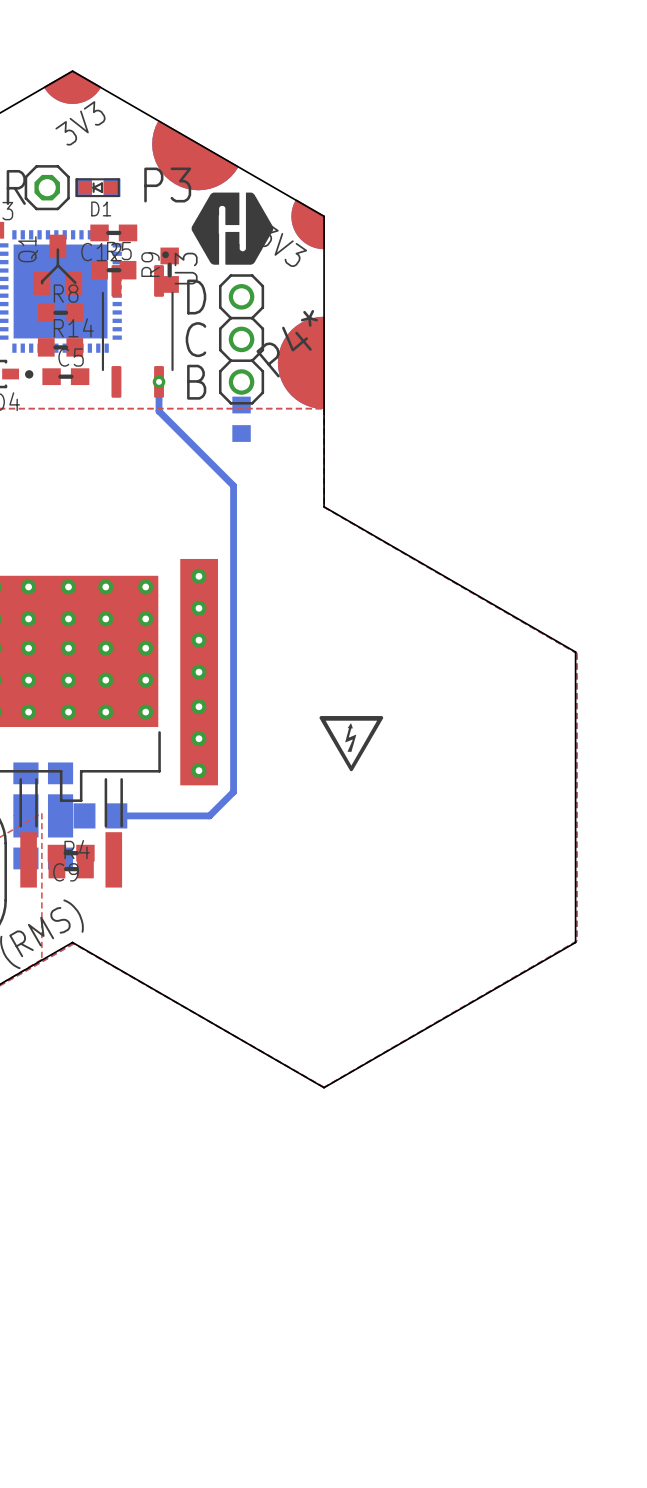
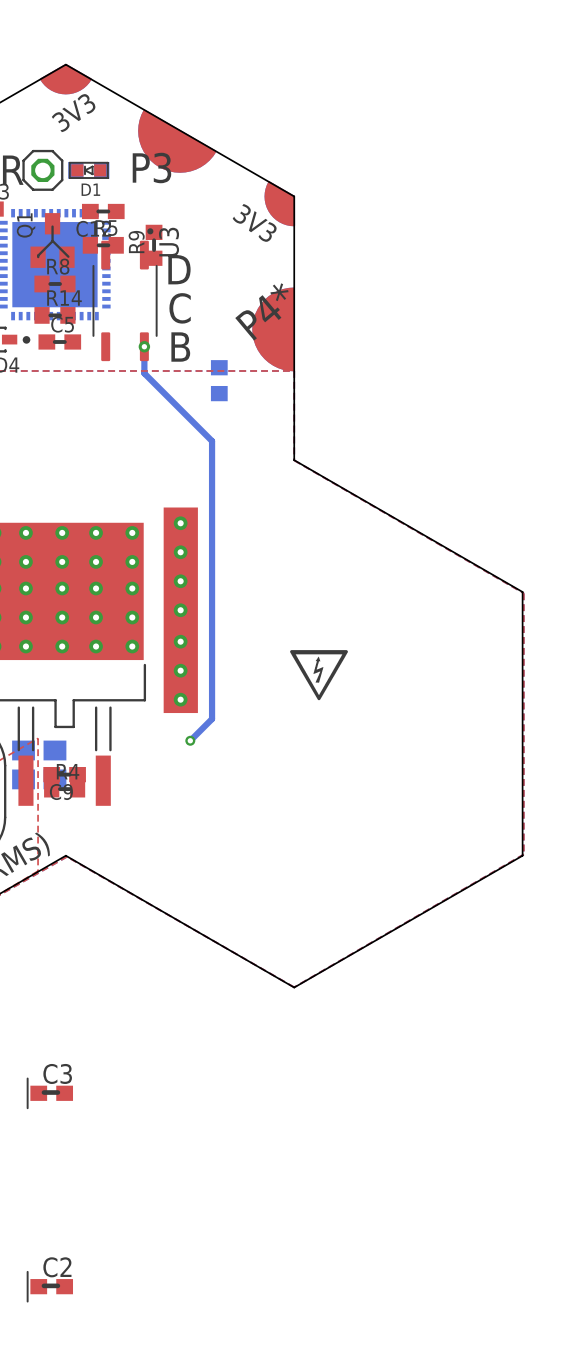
drawing: [191, 192, 274, 265] -> none
part: (241, 339) -> none
part: (25, 789) -> none
part: (60, 789) -> none
part: (100, 815) -> none
bottom track: (116, 815) (209, 815) -> none
via: none -> (190, 740)
C3: none -> (49, 1093)
C2: none -> (49, 1286)

